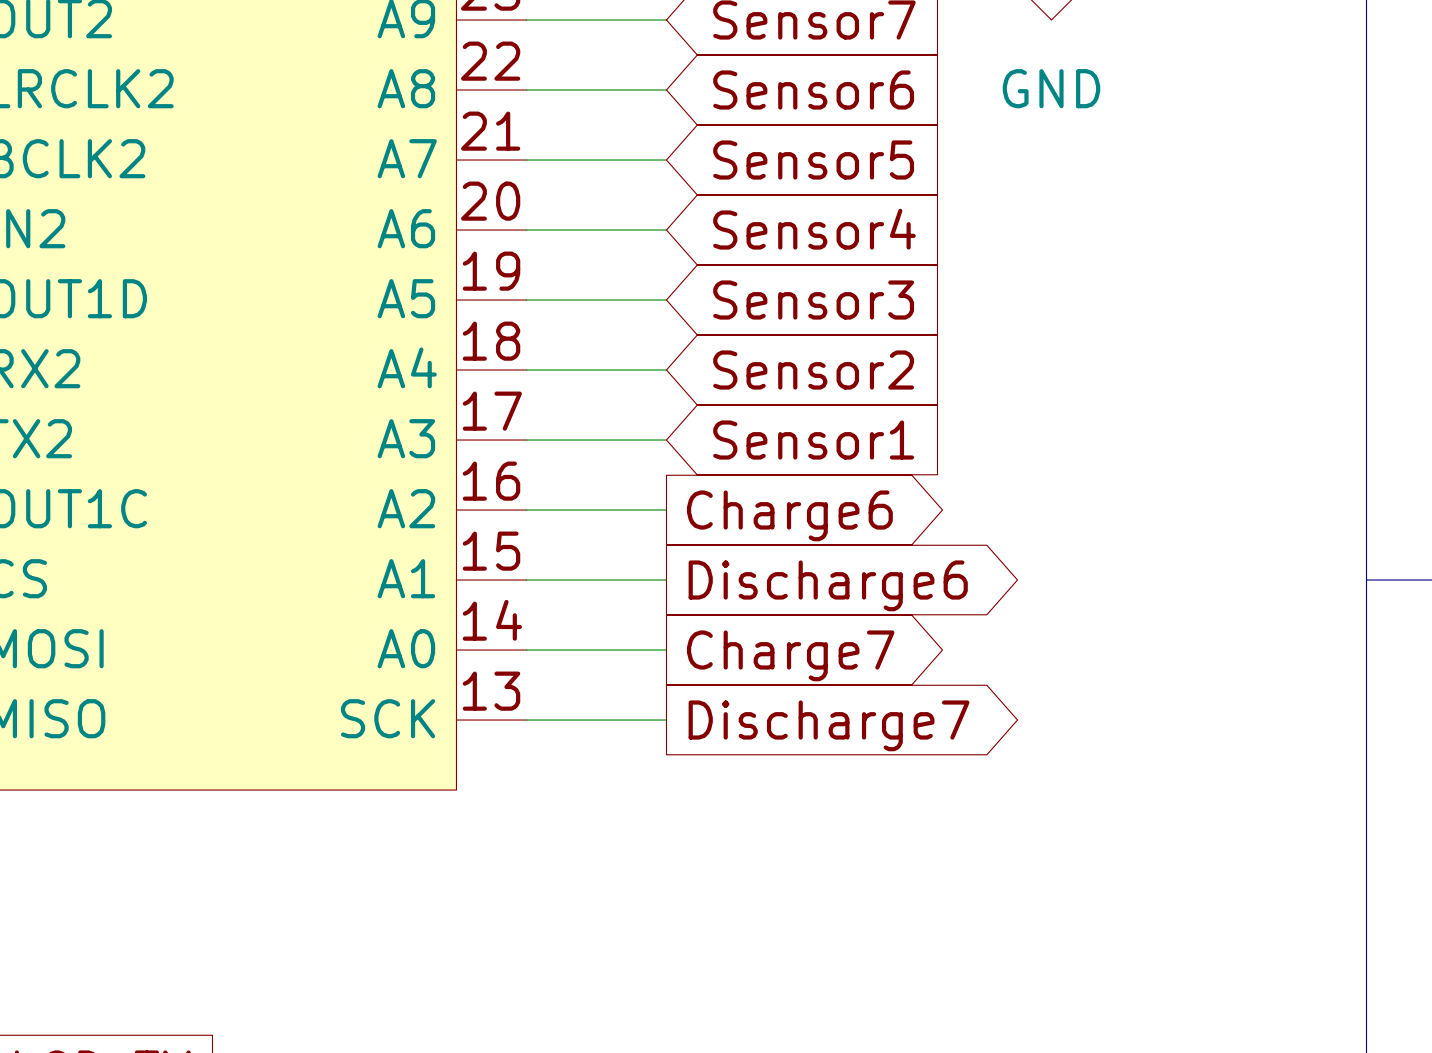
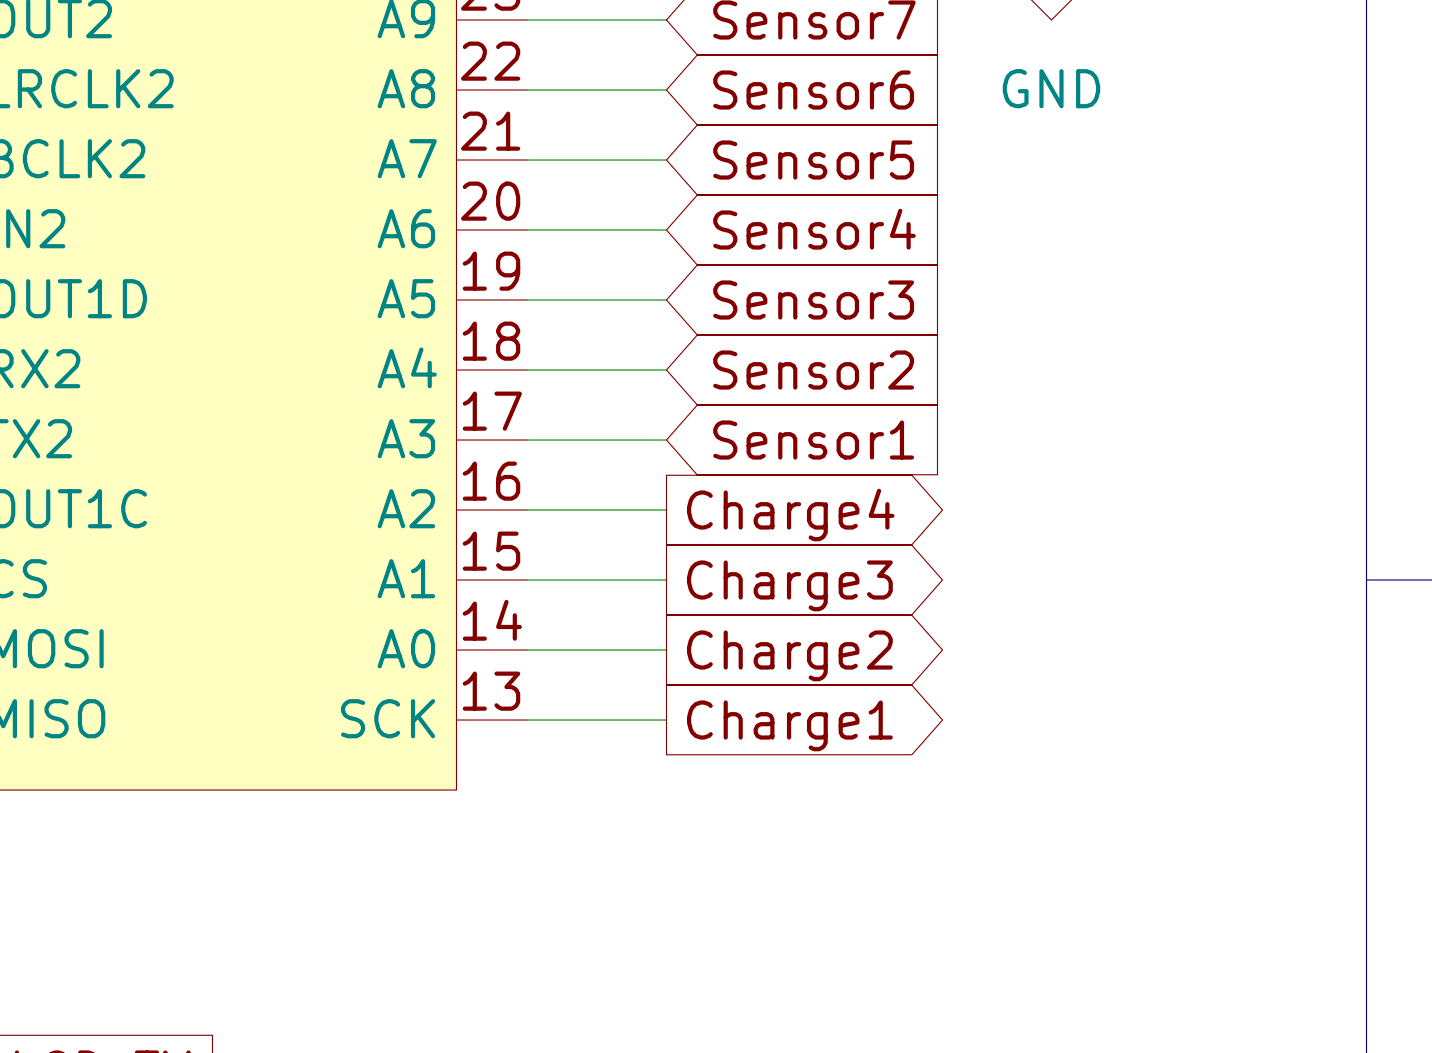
global label: Charge6 (789, 515) -> Charge4 (790, 515)
global label: Discharge6 (828, 585) -> Charge3 (789, 585)
global label: Charge7 (790, 655) -> Charge2 (789, 655)
global label: Discharge7 (829, 725) -> Charge1 (789, 725)

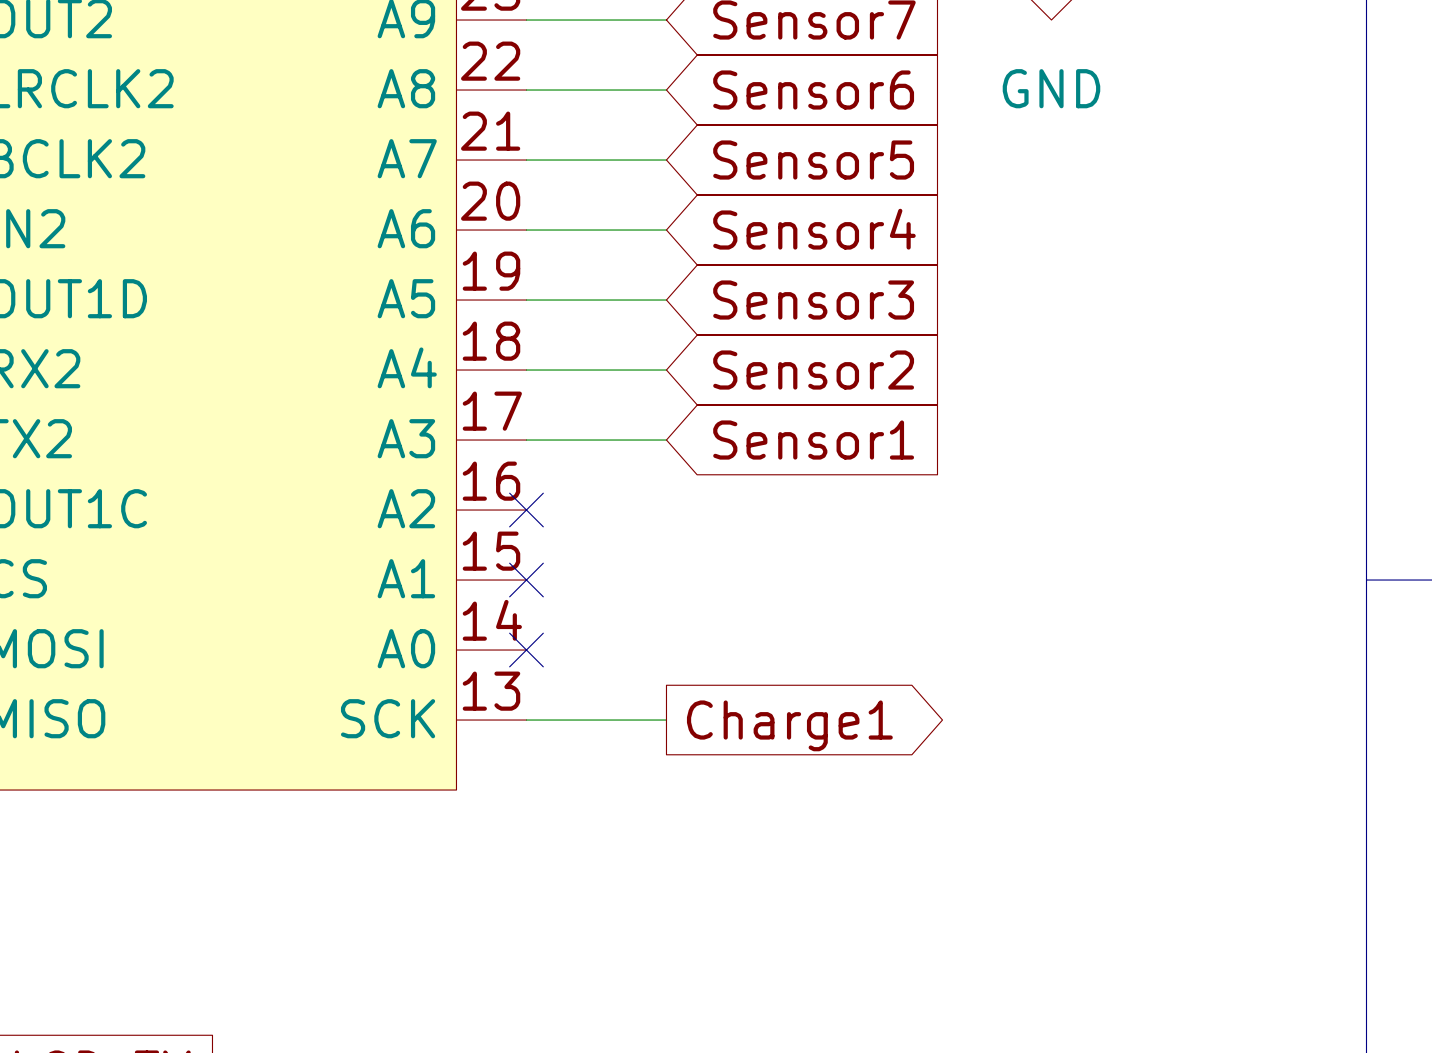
wire: (526, 510) (666, 510) -> none
no-connect mark: none -> (526, 510)
global label: Charge4 (790, 515) -> none
wire: (526, 580) (666, 580) -> none
no-connect mark: none -> (526, 580)
global label: Charge3 (789, 585) -> none
wire: (526, 650) (666, 650) -> none
no-connect mark: none -> (526, 650)
global label: Charge2 (789, 655) -> none

